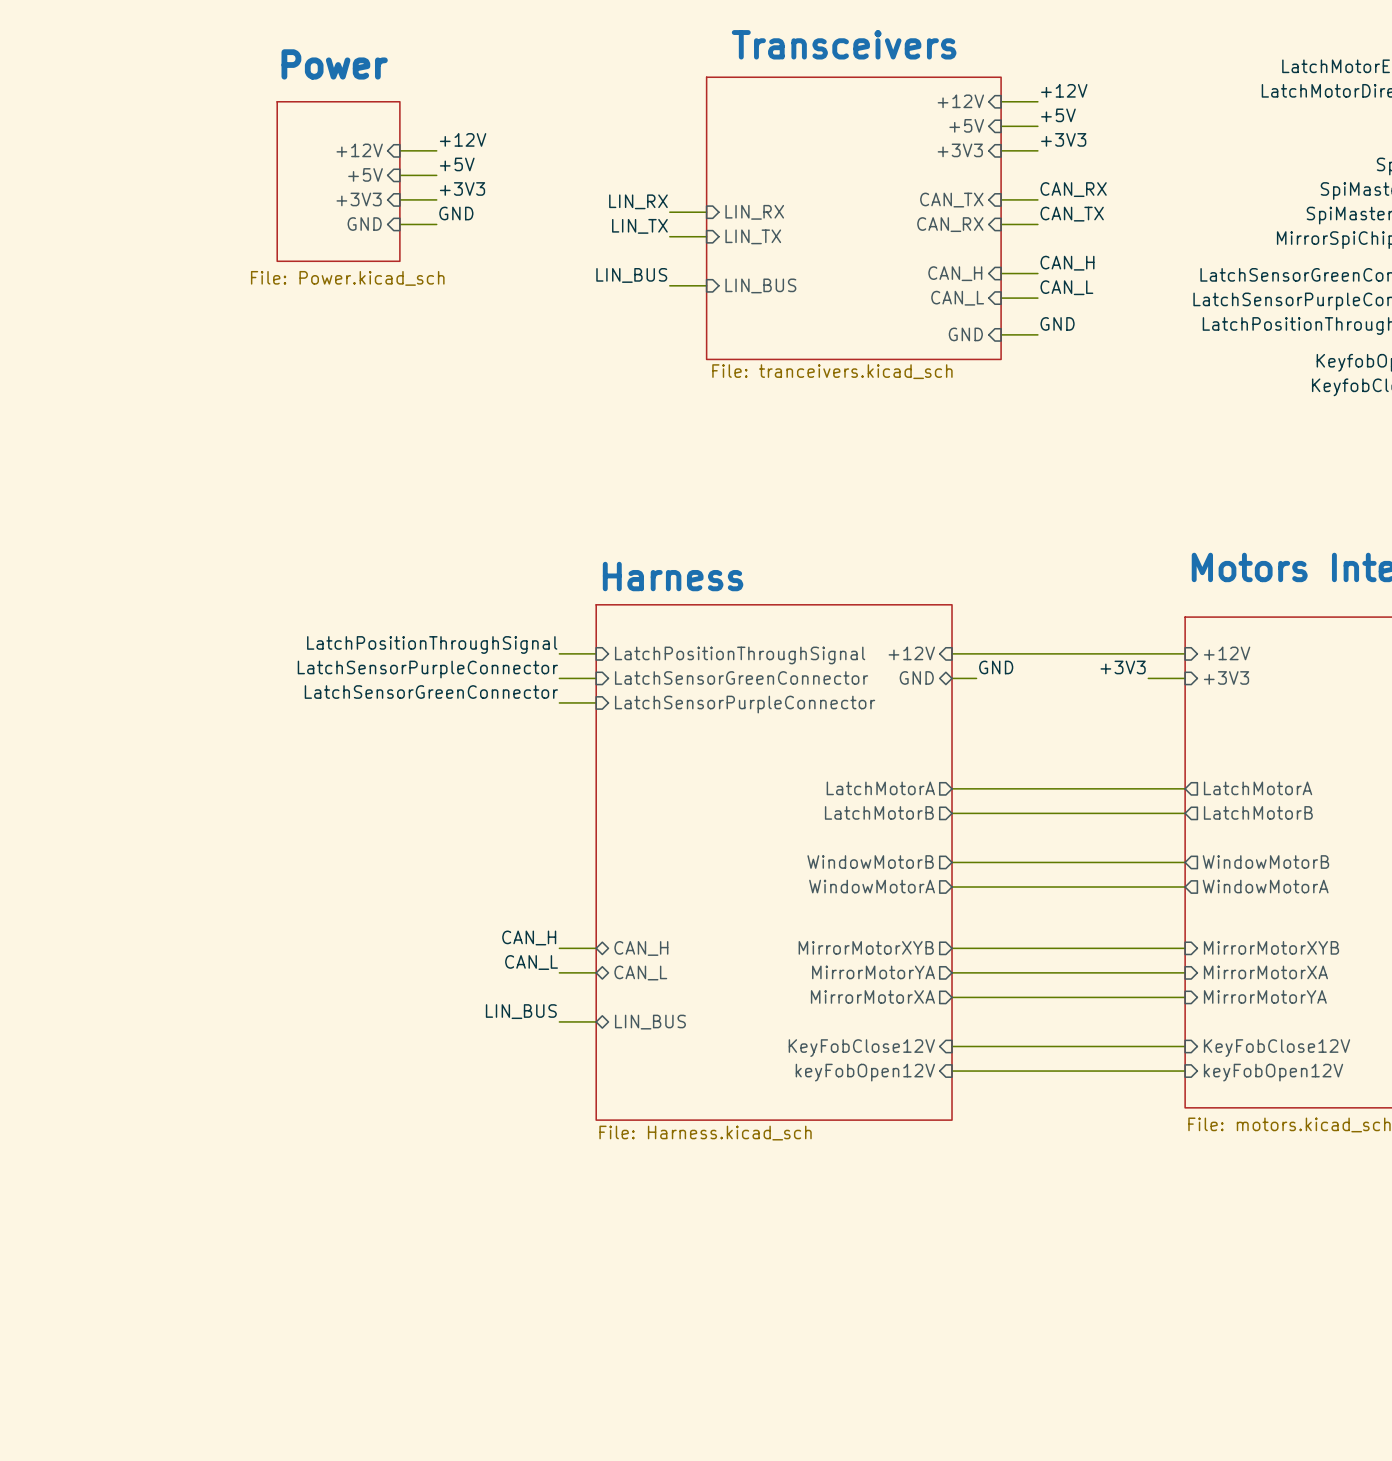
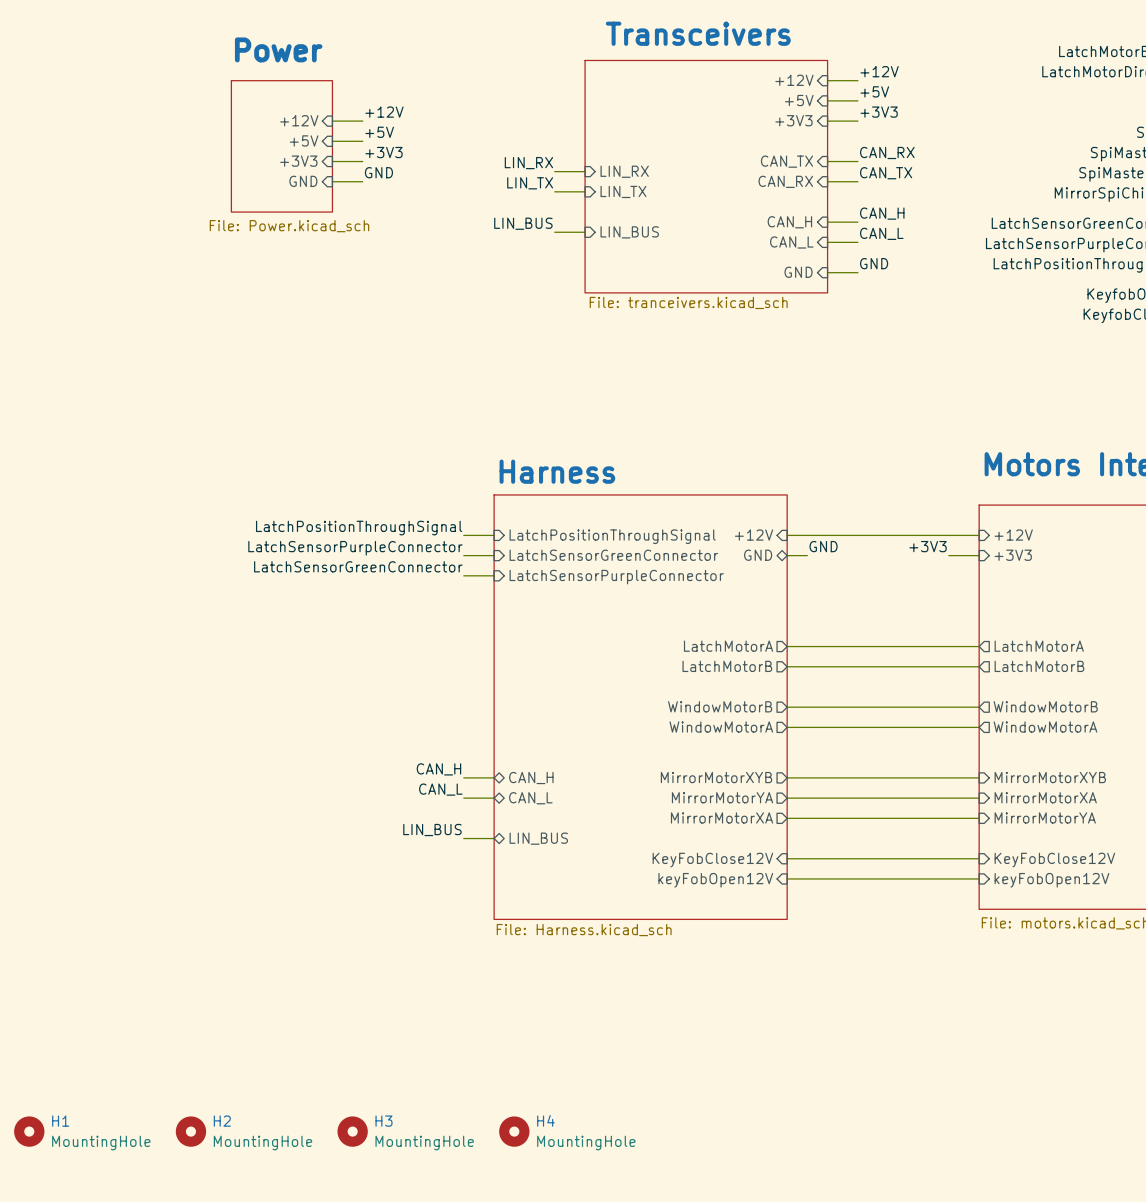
H1: none -> MountingHole (29, 1131)
H2: none -> MountingHole (190, 1131)
H3: none -> MountingHole (352, 1131)
H4: none -> MountingHole (514, 1131)

